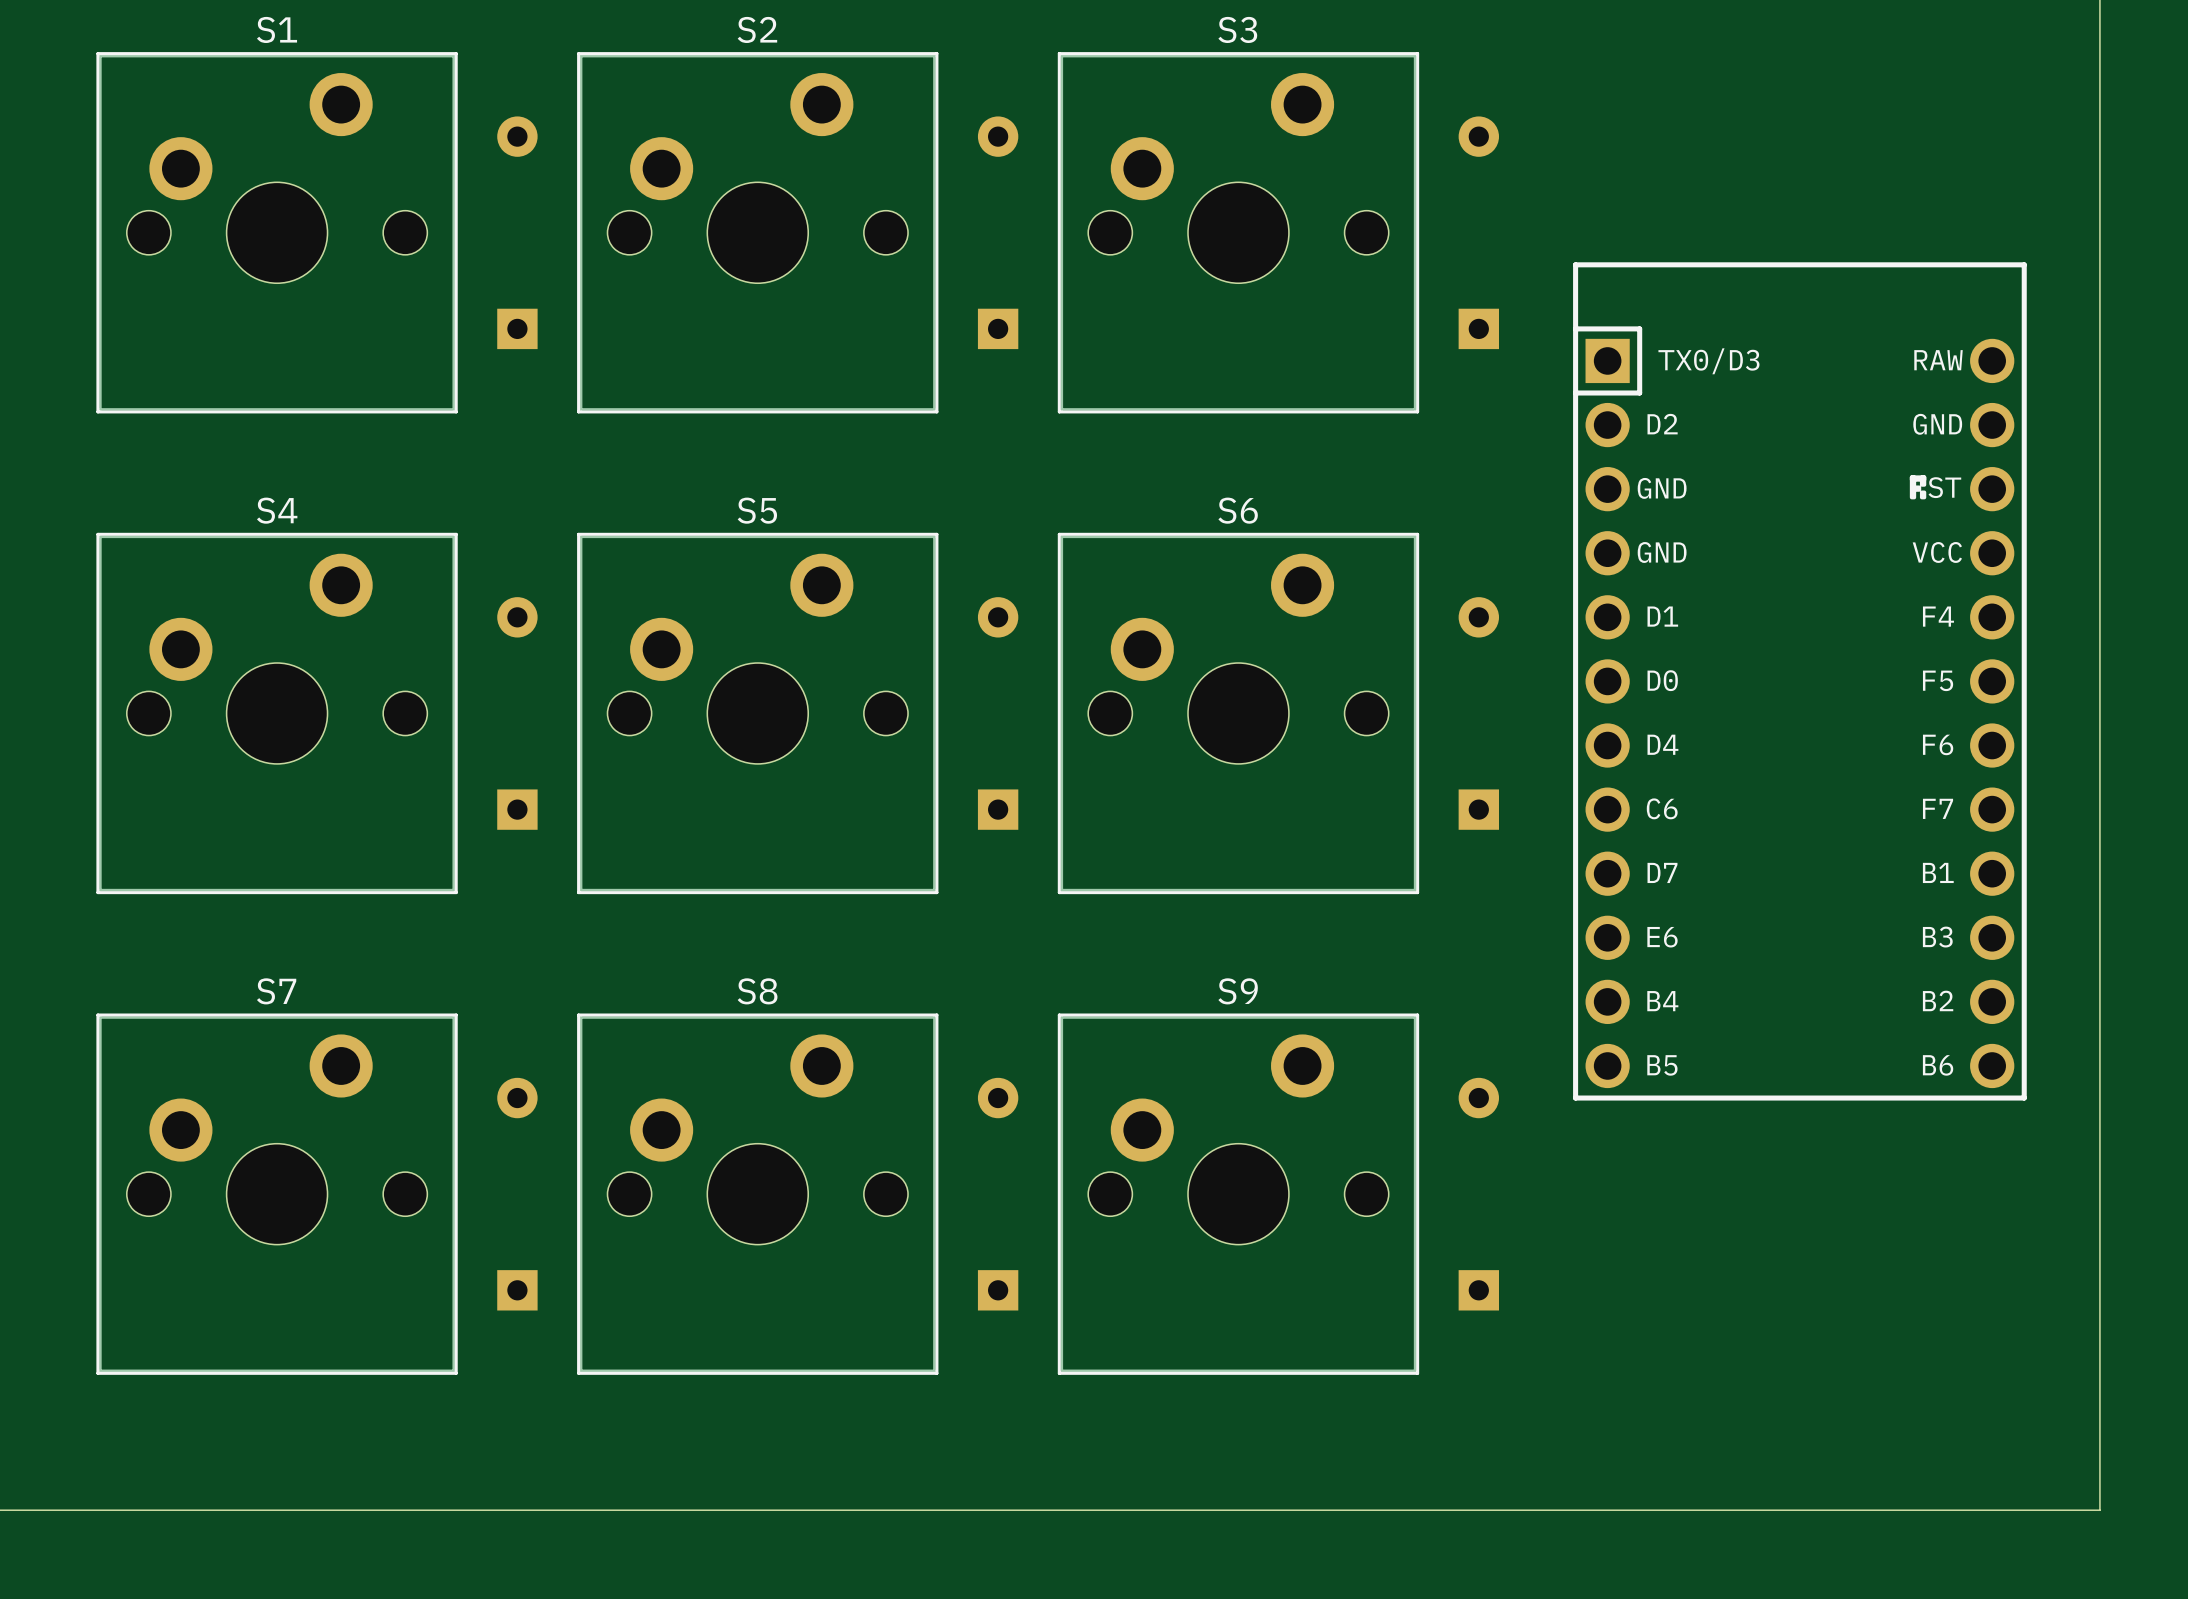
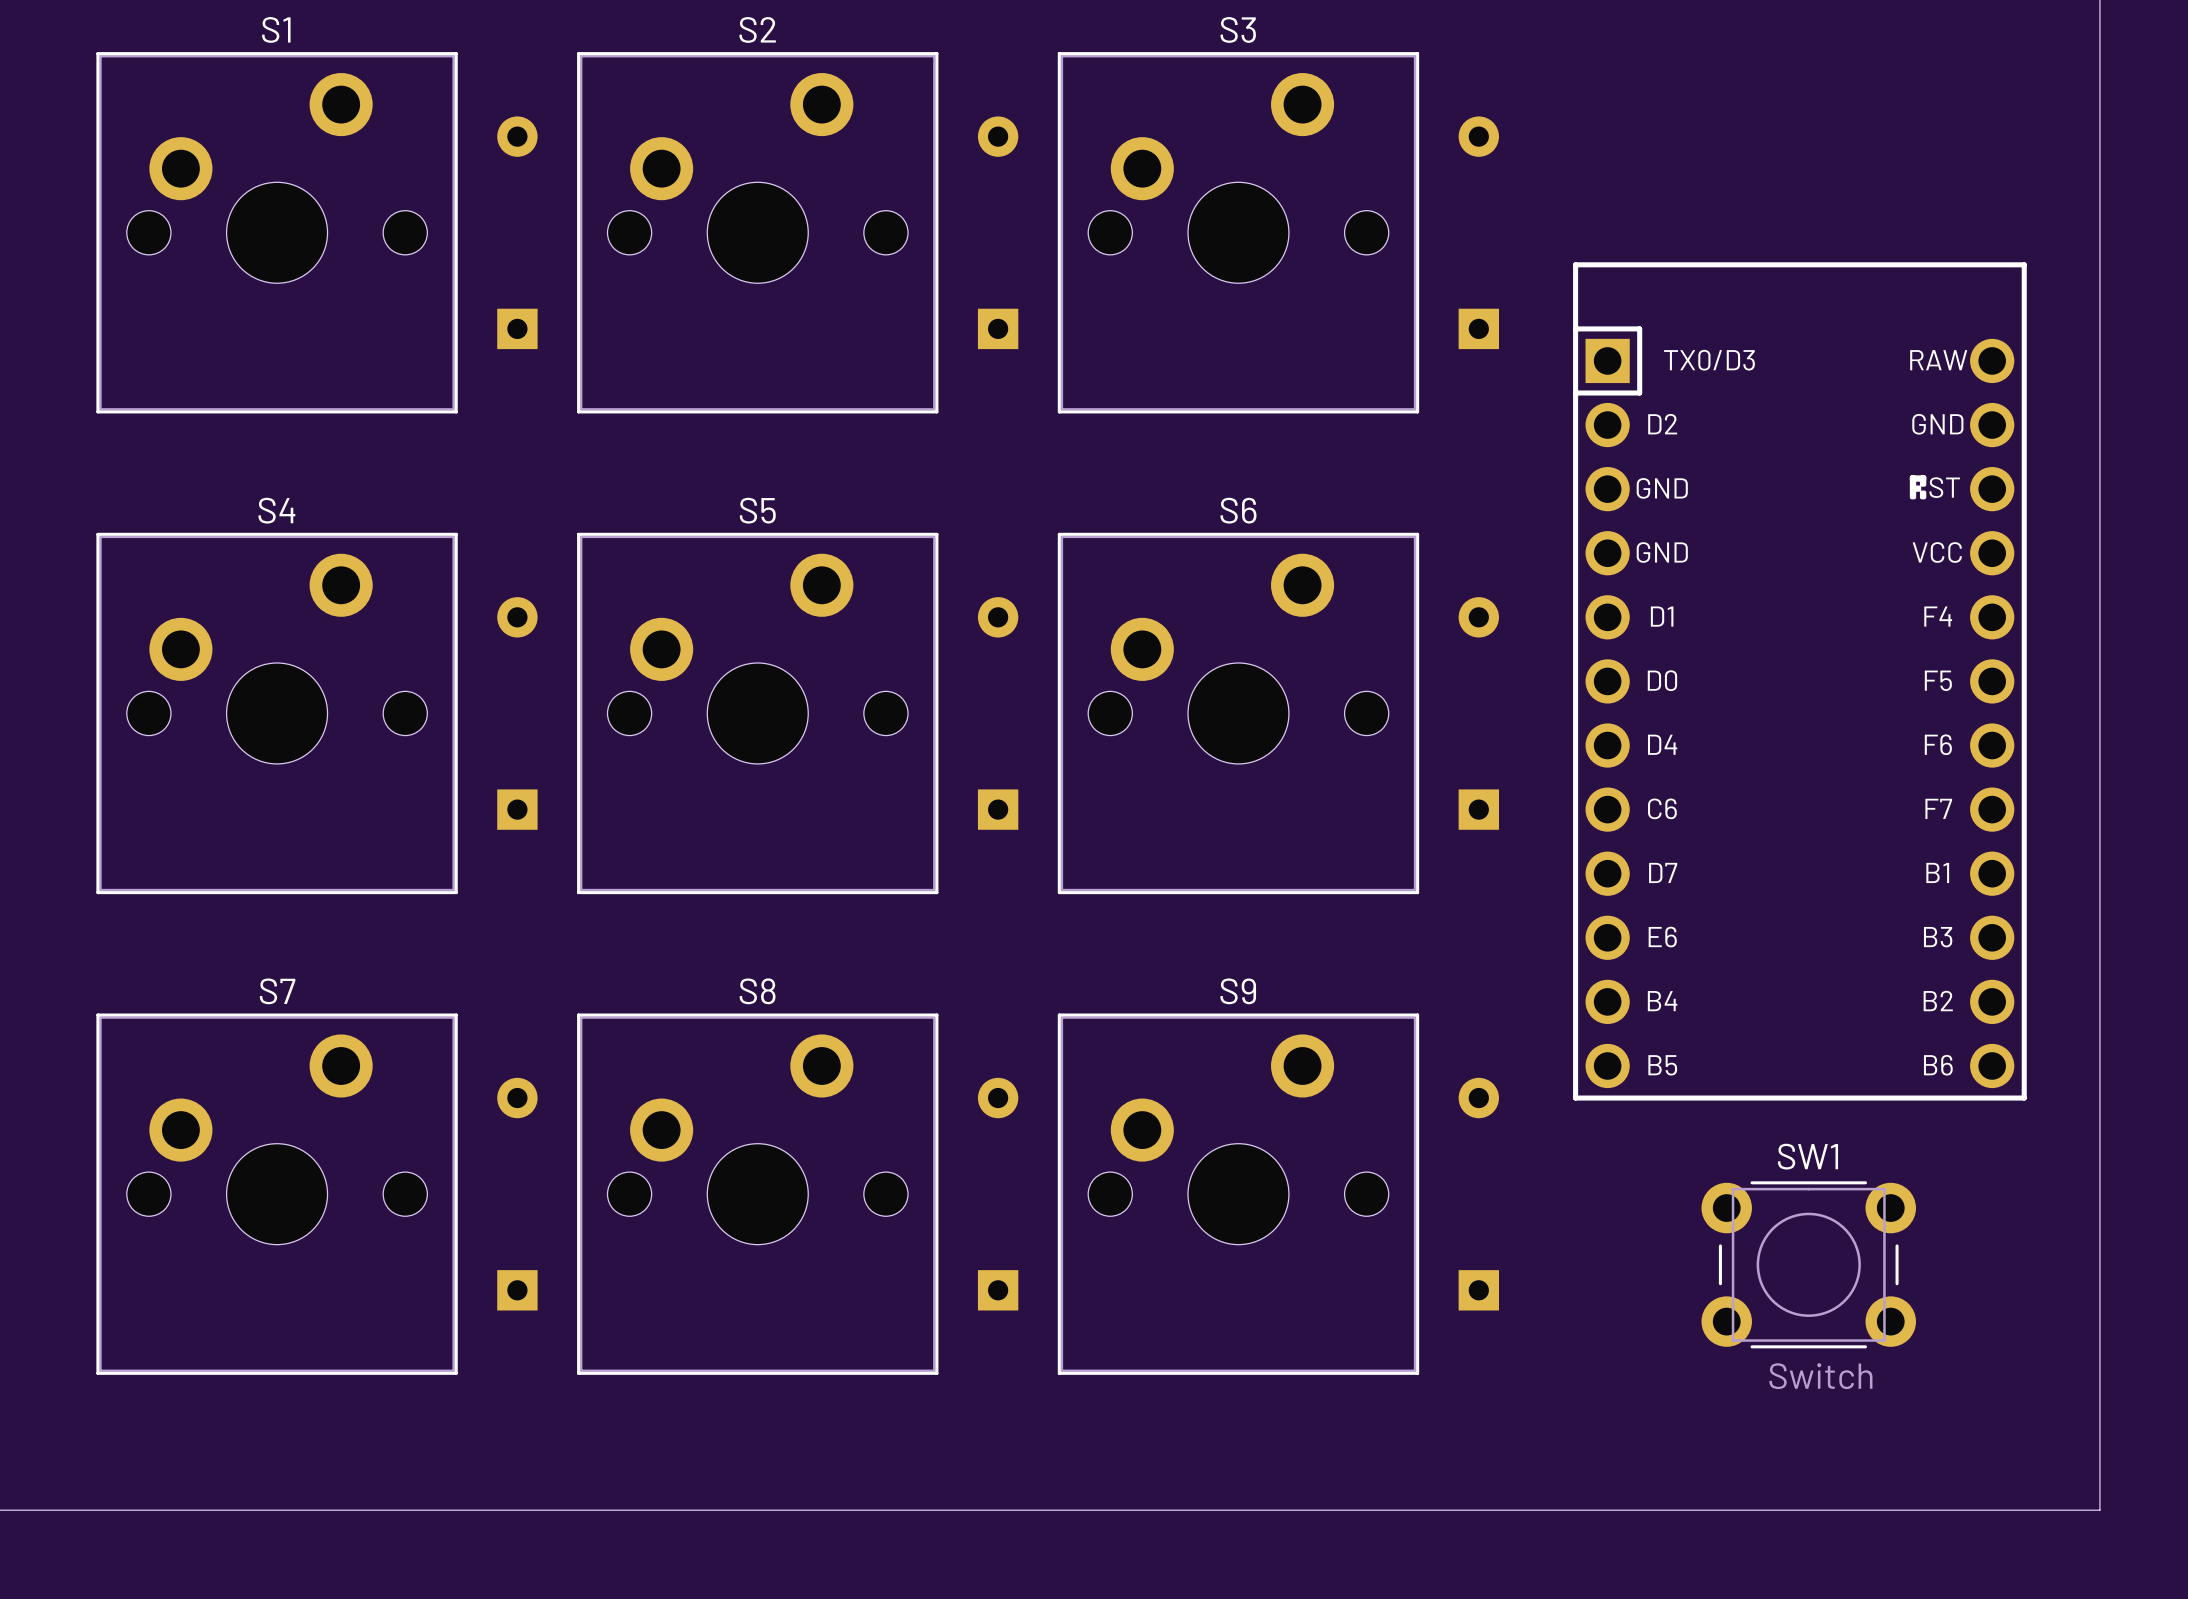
SW1: none -> Switch (1808, 1264)

